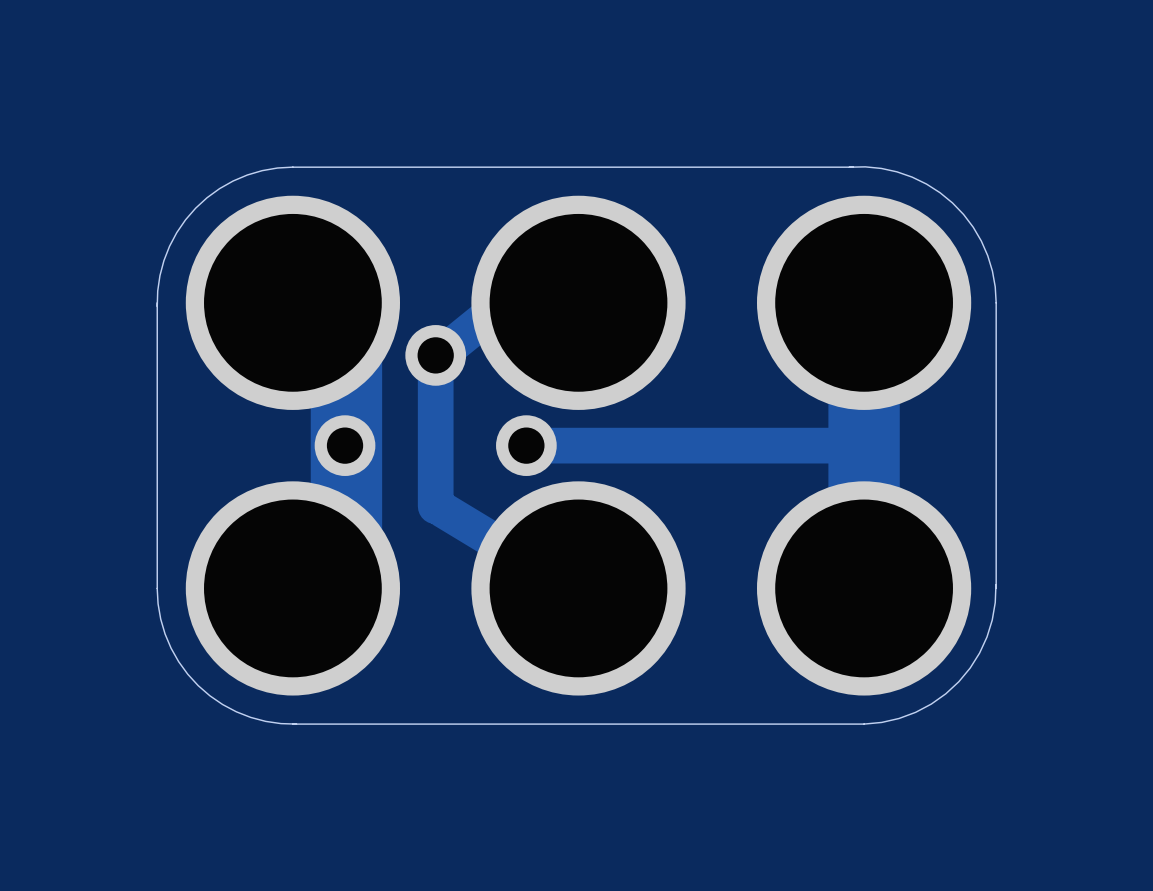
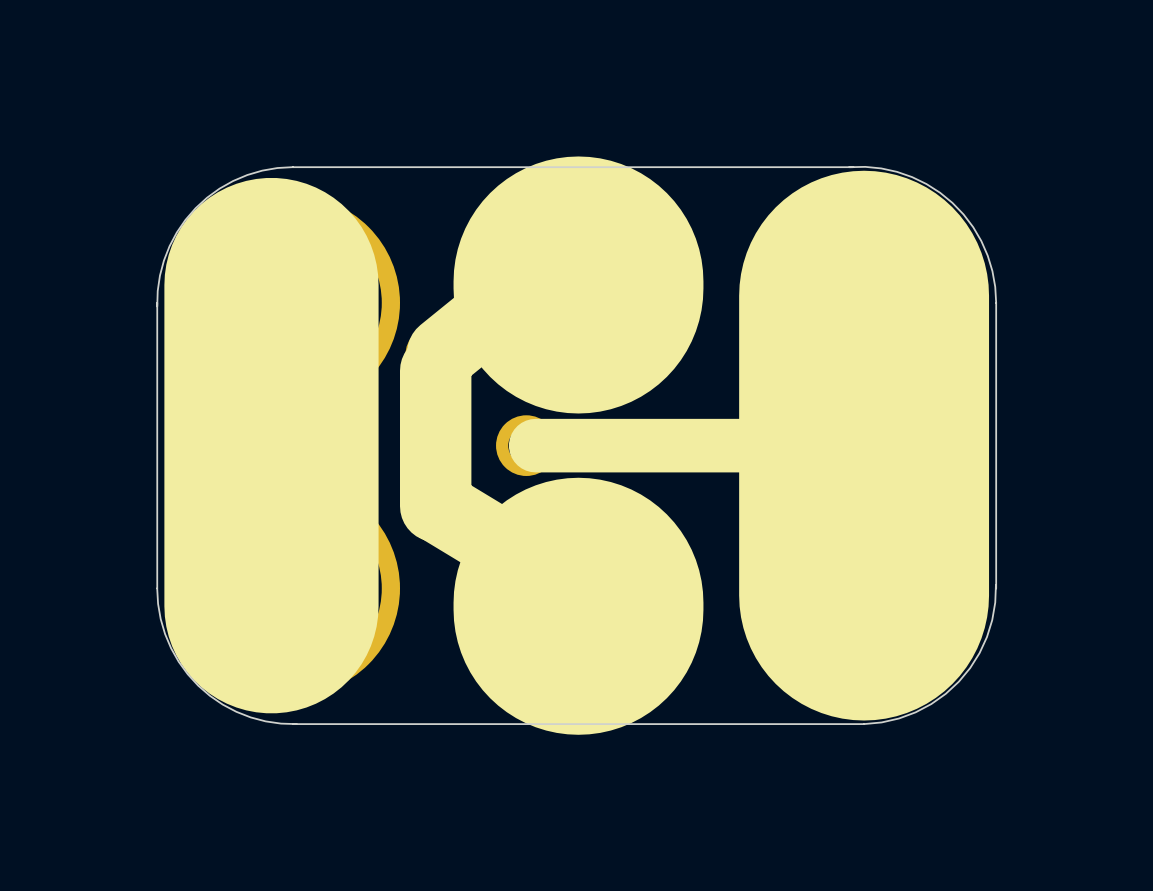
part footprint: [156, 166, 997, 725] -> [156, 156, 997, 735]

